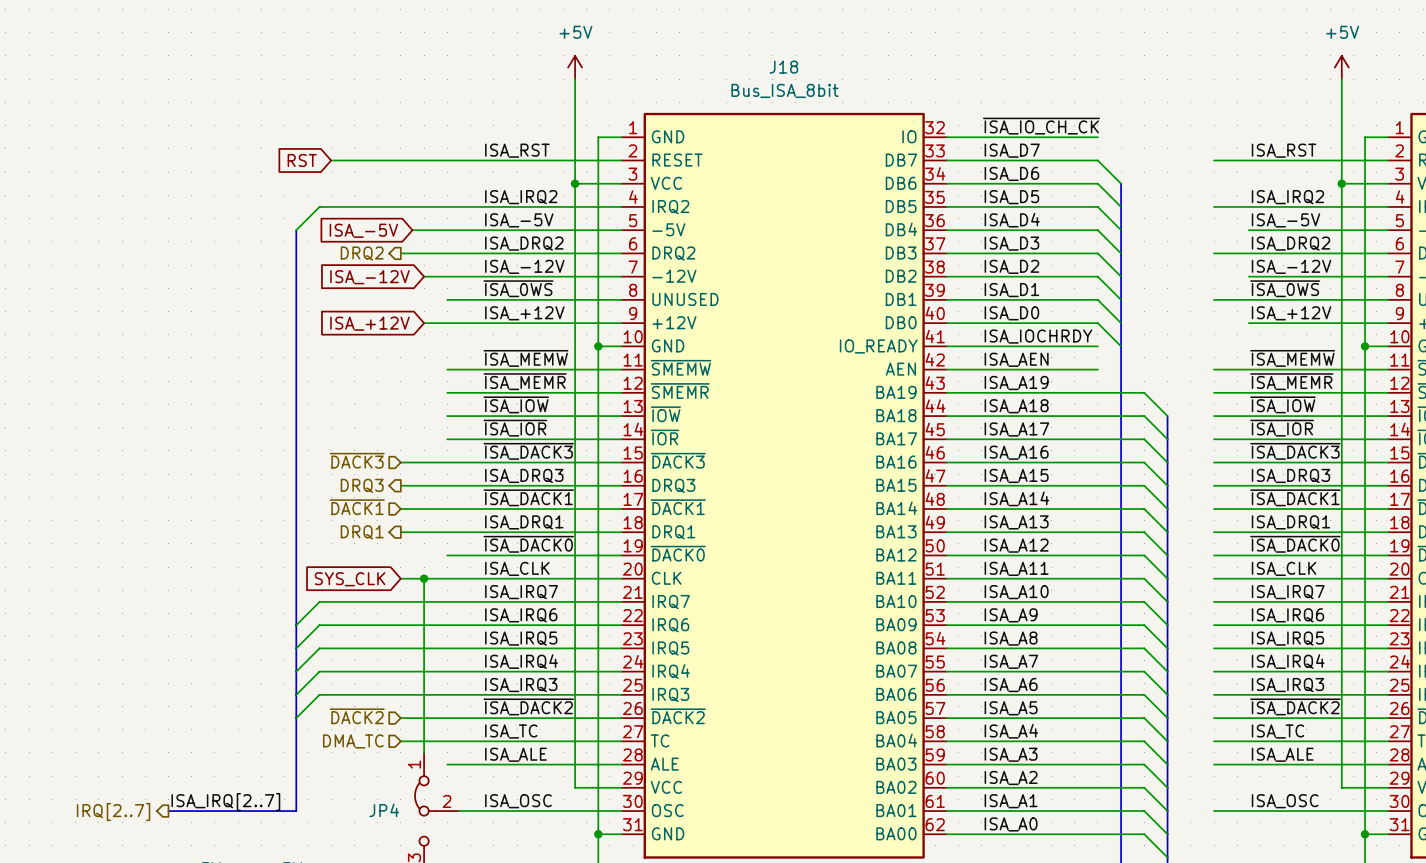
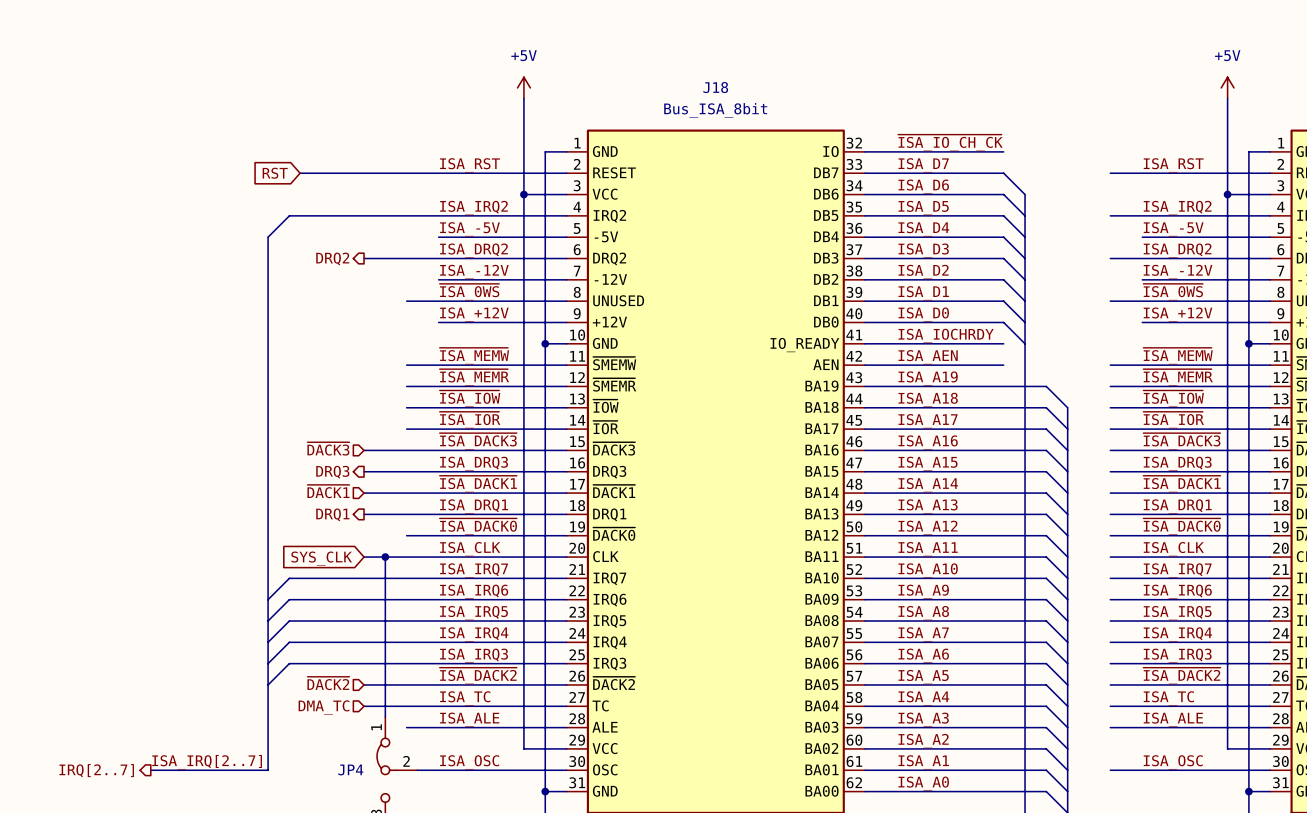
global label: ISA_-5V (363, 230) -> none
wire: (412, 230) (482, 230) -> none
wire: (424, 276) (482, 276) -> none
global label: ISA_-12V (369, 277) -> none
global label: ISA_+12V (369, 323) -> none
wire: (424, 323) (482, 323) -> none

